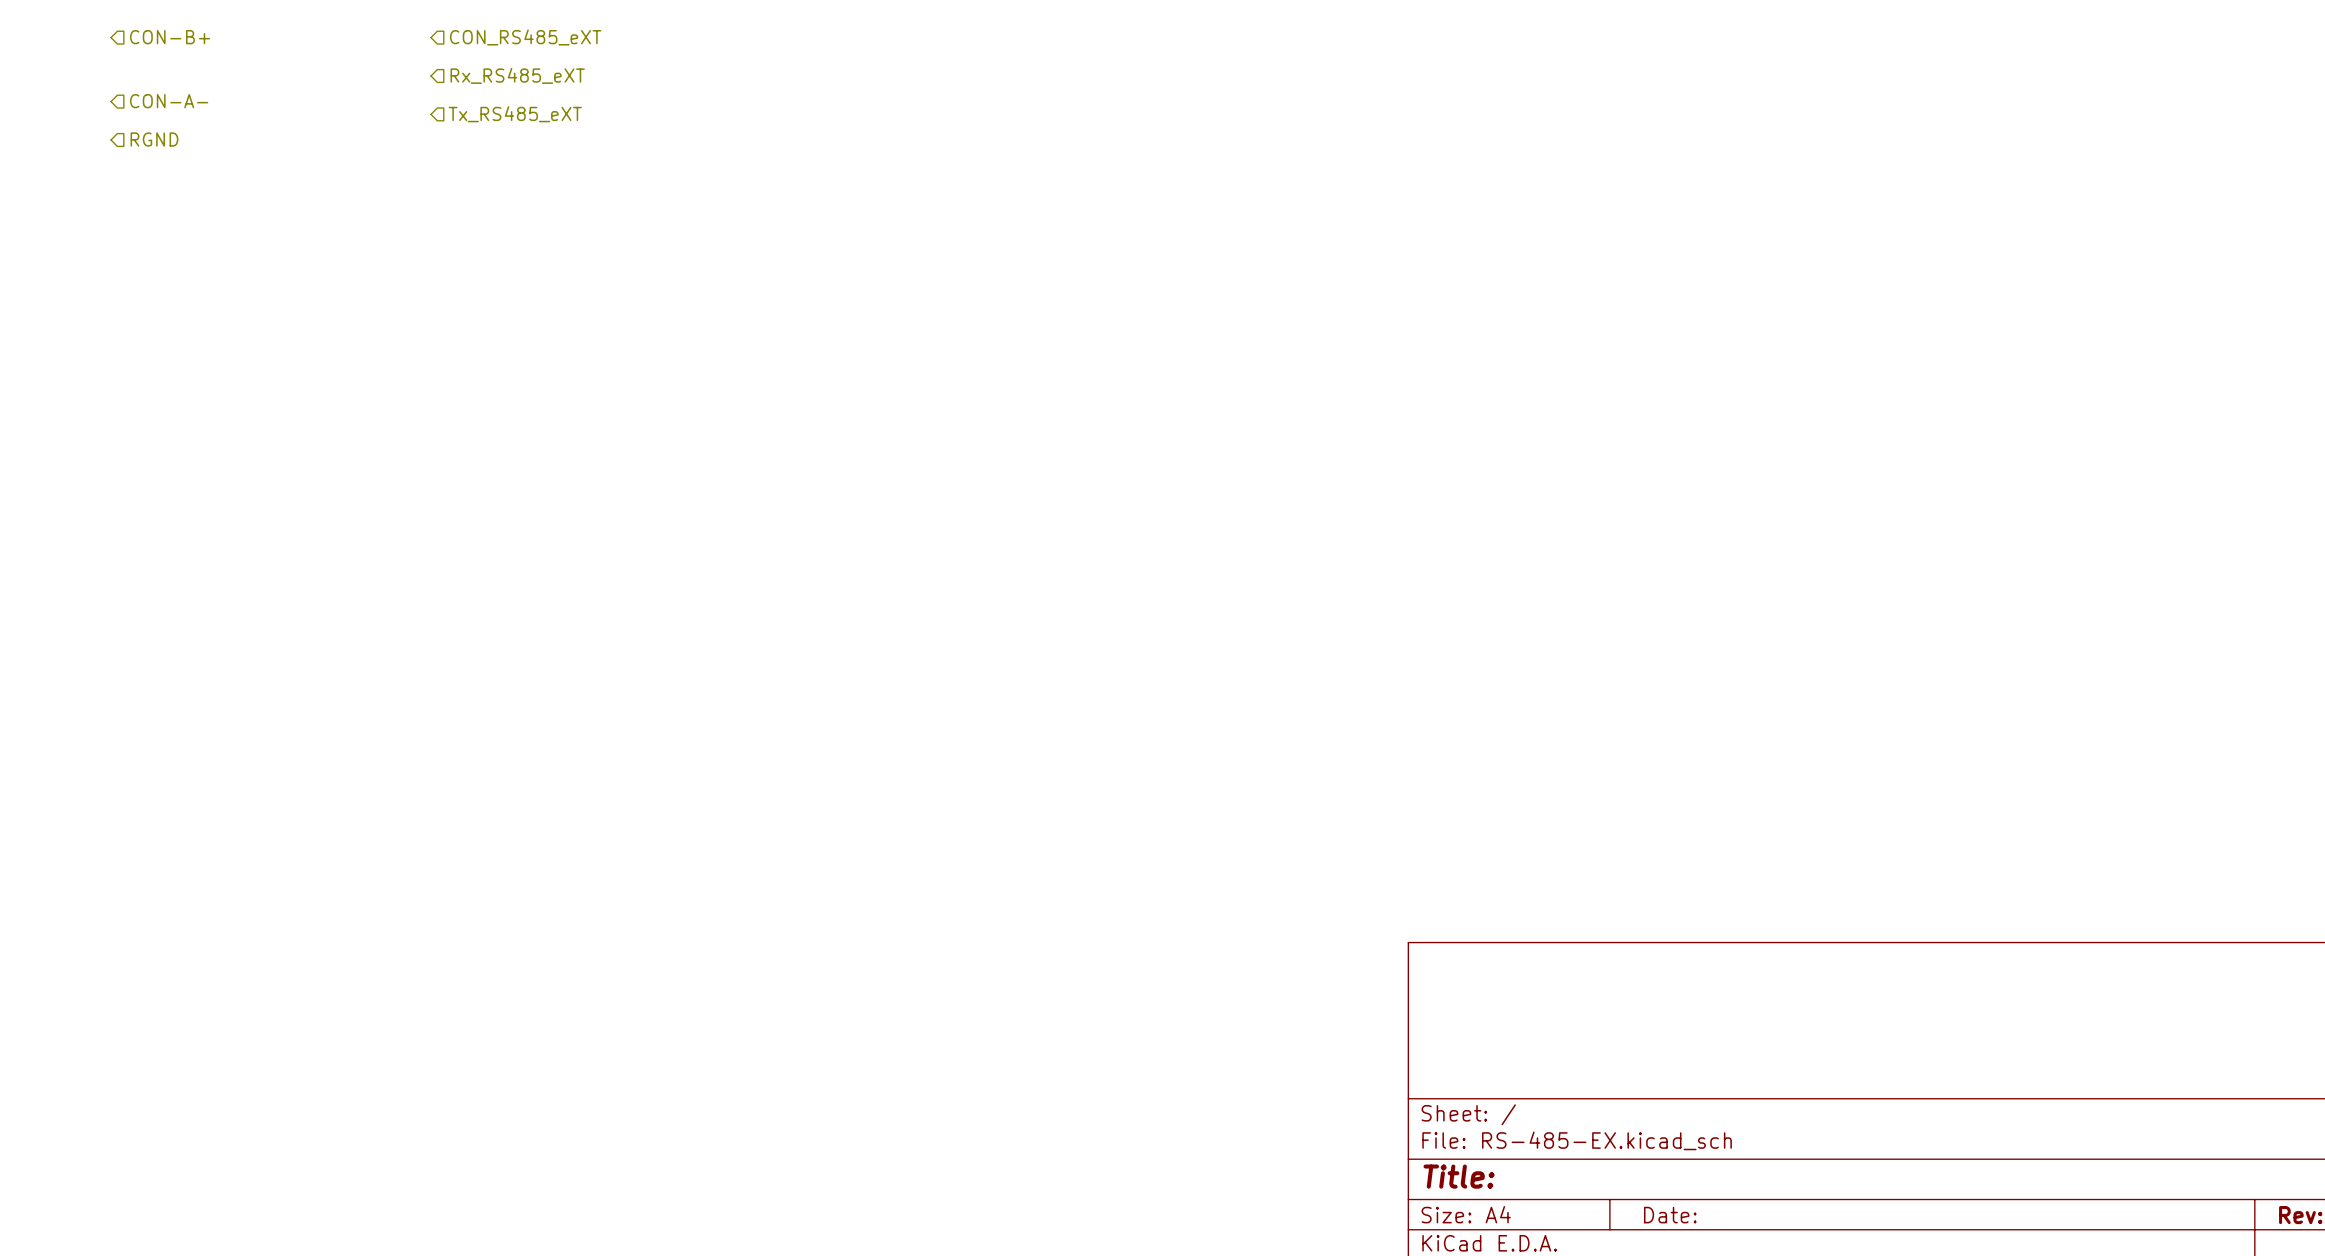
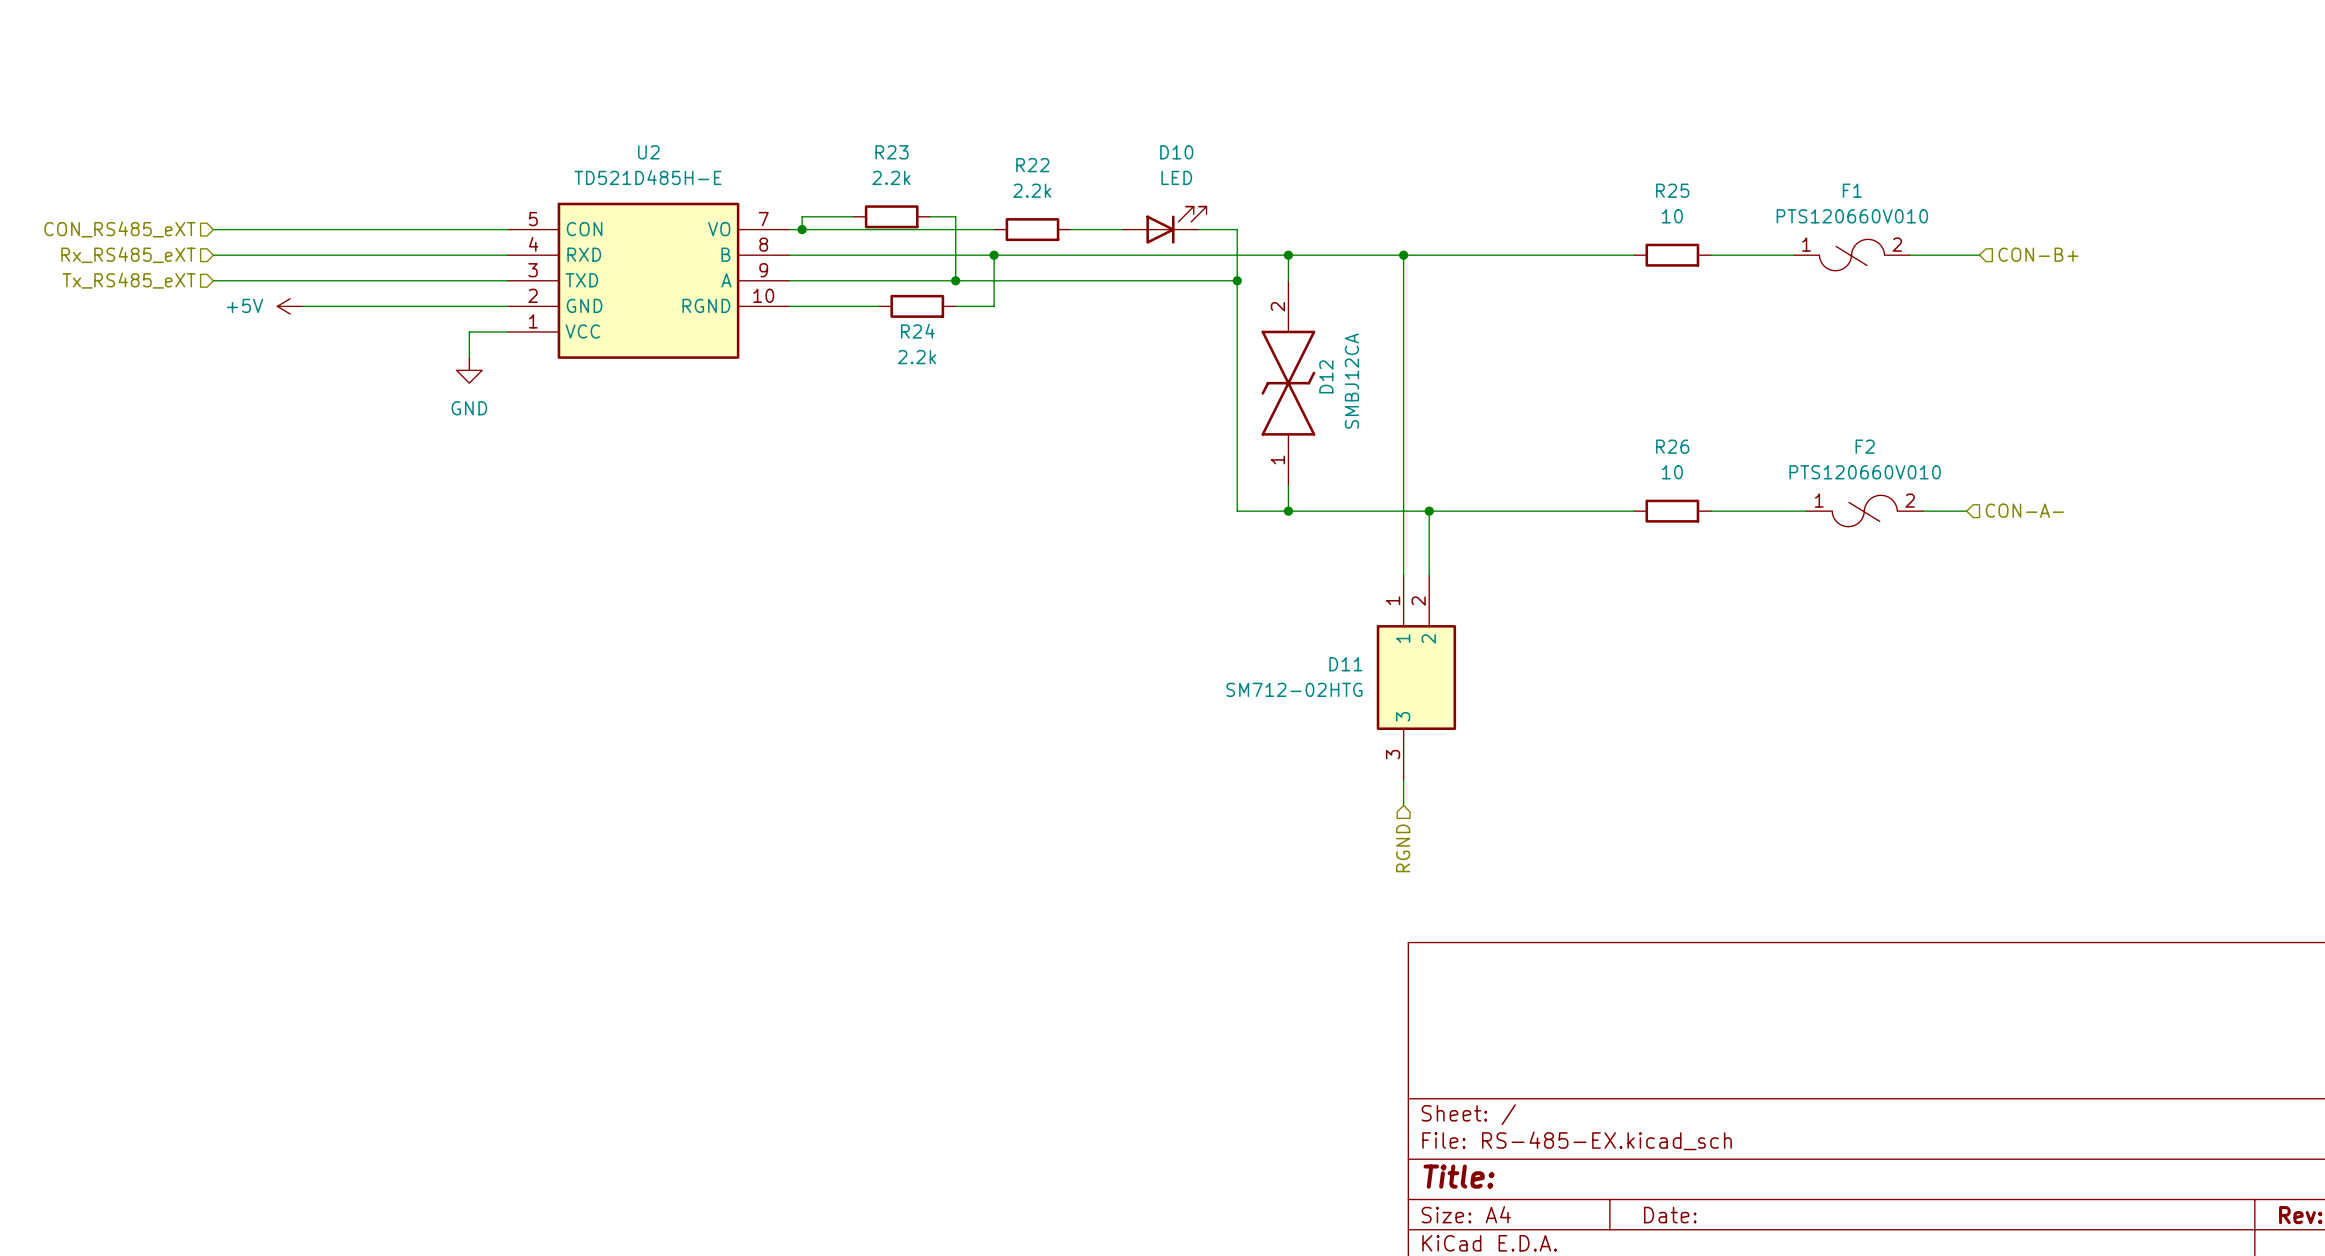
hierarchical label: CON-B+ (170, 37) -> none
hierarchical label: CON_RS485_eXT (525, 37) -> none
hierarchical label: Rx_RS485_eXT (517, 75) -> none
hierarchical label: CON-A- (169, 101) -> none
hierarchical label: Tx_RS485_eXT (515, 114) -> none
hierarchical label: RGND (154, 139) -> none
wire: none -> (853, 216) (802, 216) (802, 229)
R23: none -> 2.2k (891, 216)
wire: none -> (930, 216) (955, 216) (955, 280)
D10: none -> LED (1164, 225)
hierarchical label: none -> CON_RS485_eXT (119, 229)
wire: none -> (213, 229) (507, 229)
wire: none -> (789, 229) (994, 229)
junction: none -> (802, 229)
R22: none -> 2.2k (1032, 229)
wire: none -> (1070, 229) (1122, 229)
wire: none -> (1198, 229) (1237, 229) (1237, 511) (1633, 511)
hierarchical label: none -> CON-B+ (2038, 254)
hierarchical label: none -> Rx_RS485_eXT (128, 255)
wire: none -> (213, 255) (507, 255)
wire: none -> (789, 255) (1633, 255)
wire: none -> (994, 255) (994, 306) (955, 306)
junction: none -> (994, 255)
wire: none -> (1288, 255) (1288, 280)
junction: none -> (1288, 255)
wire: none -> (1403, 255) (1403, 575)
junction: none -> (1403, 255)
R25: none -> 10 (1672, 255)
wire: none -> (1710, 255) (1793, 255)
F1: none -> PTS120660V010 (1852, 255)
wire: none -> (1910, 255) (1979, 255)
hierarchical label: none -> Tx_RS485_eXT (129, 280)
wire: none -> (213, 280) (507, 280)
U2: none -> TD521D485H-E (648, 280)
wire: none -> (789, 280) (1237, 280)
junction: none -> (955, 280)
junction: none -> (1237, 280)
power symbol: none -> +5V (290, 306)
wire: none -> (302, 306) (507, 306)
wire: none -> (789, 306) (878, 306)
R24: none -> 2.2k (917, 306)
wire: none -> (507, 331) (469, 331) (469, 357)
power symbol: none -> GND (469, 370)
D12: none -> SMBJ12CA (1288, 383)
wire: none -> (1288, 485) (1288, 511)
hierarchical label: none -> CON-A- (2024, 510)
junction: none -> (1288, 511)
wire: none -> (1429, 511) (1429, 575)
junction: none -> (1429, 511)
R26: none -> 10 (1672, 511)
wire: none -> (1710, 511) (1806, 511)
F2: none -> PTS120660V010 (1864, 511)
wire: none -> (1923, 511) (1966, 511)
D11: none -> SM712-02HTG (1416, 677)
wire: none -> (1403, 779) (1403, 805)
hierarchical label: none -> RGND (1403, 848)

